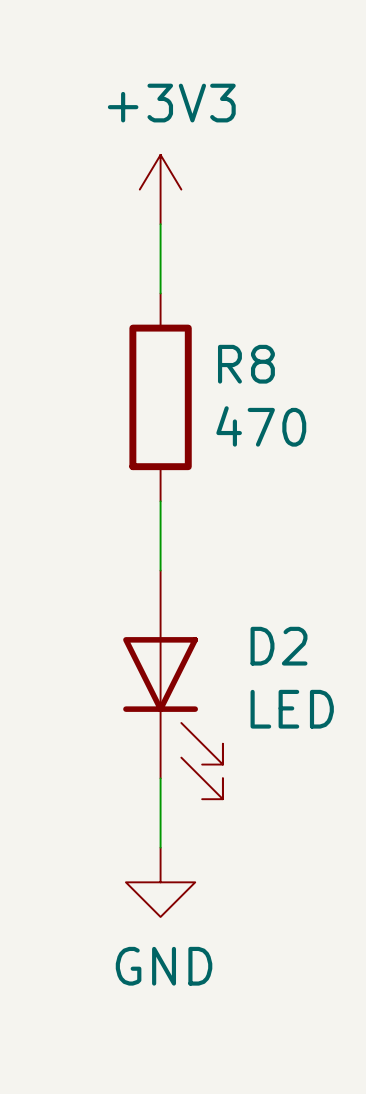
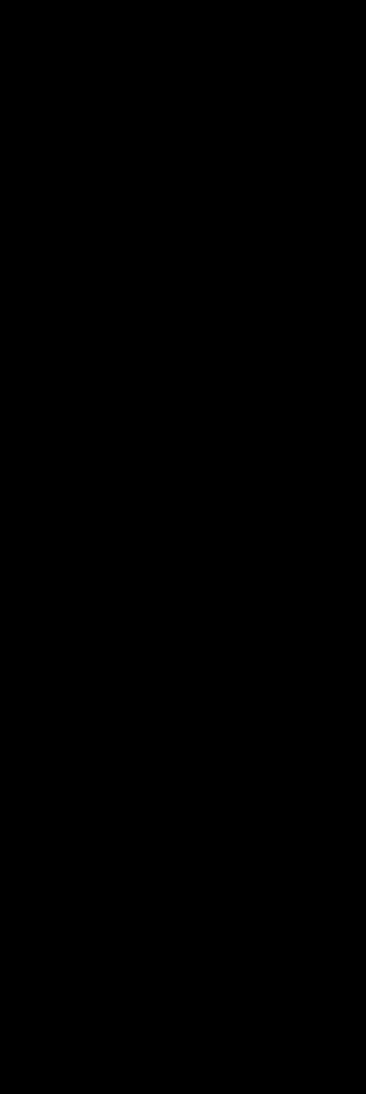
power symbol: +3V3 (160, 189) -> none
wire: (160, 224) (160, 293) -> none
R8: 470 (160, 397) -> none
wire: (160, 501) (160, 570) -> none
D2: LED (173, 684) -> none
wire: (160, 778) (160, 847) -> none
power symbol: GND (160, 882) -> none

